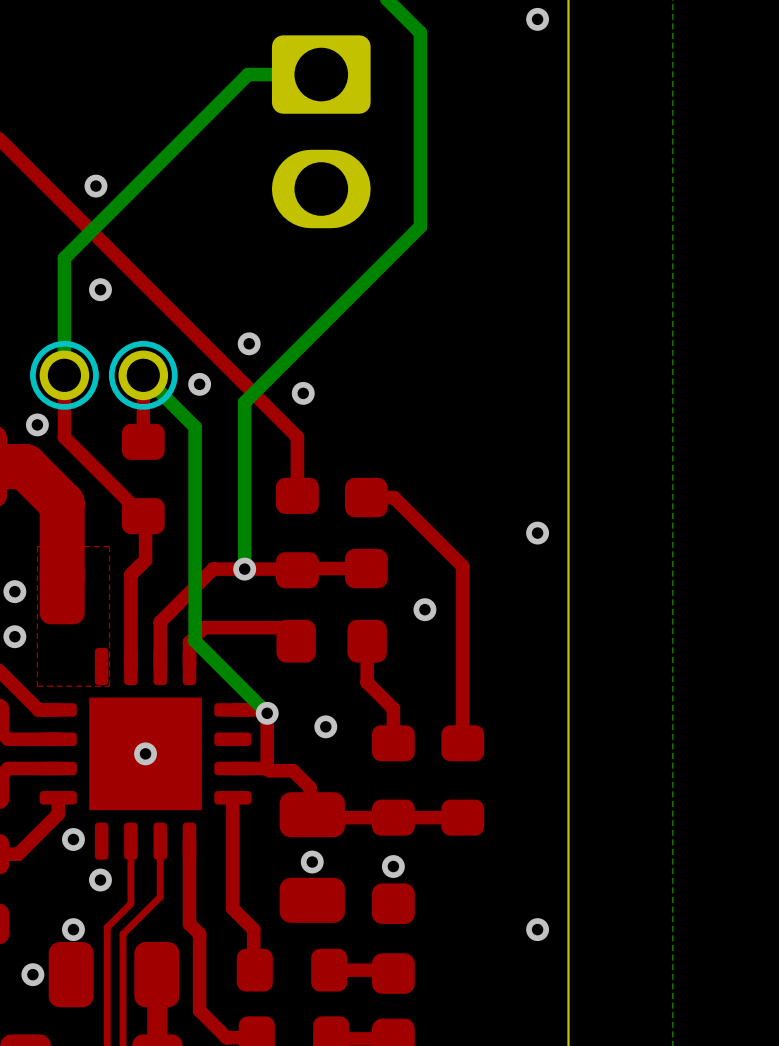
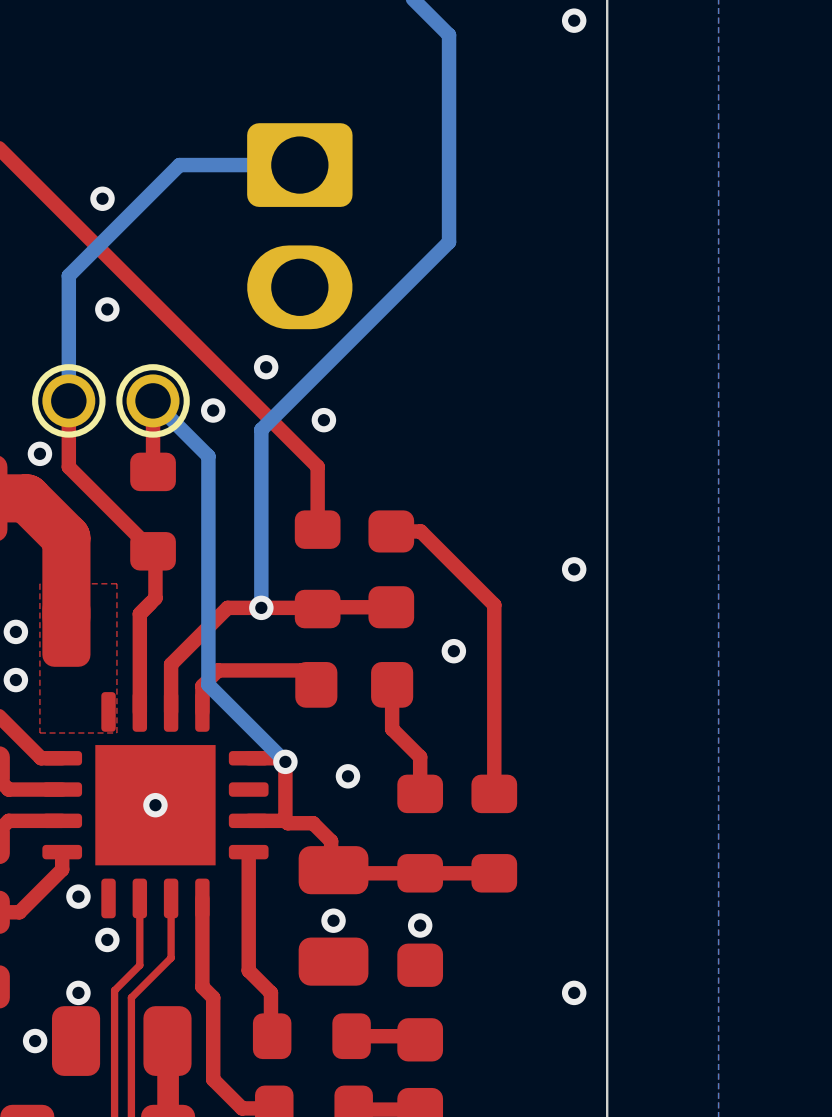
bottom track: (321, 74) (248, 74) (168, 154) -> (299, 165) (179, 165)
part position: (321, 131) -> (299, 226)

